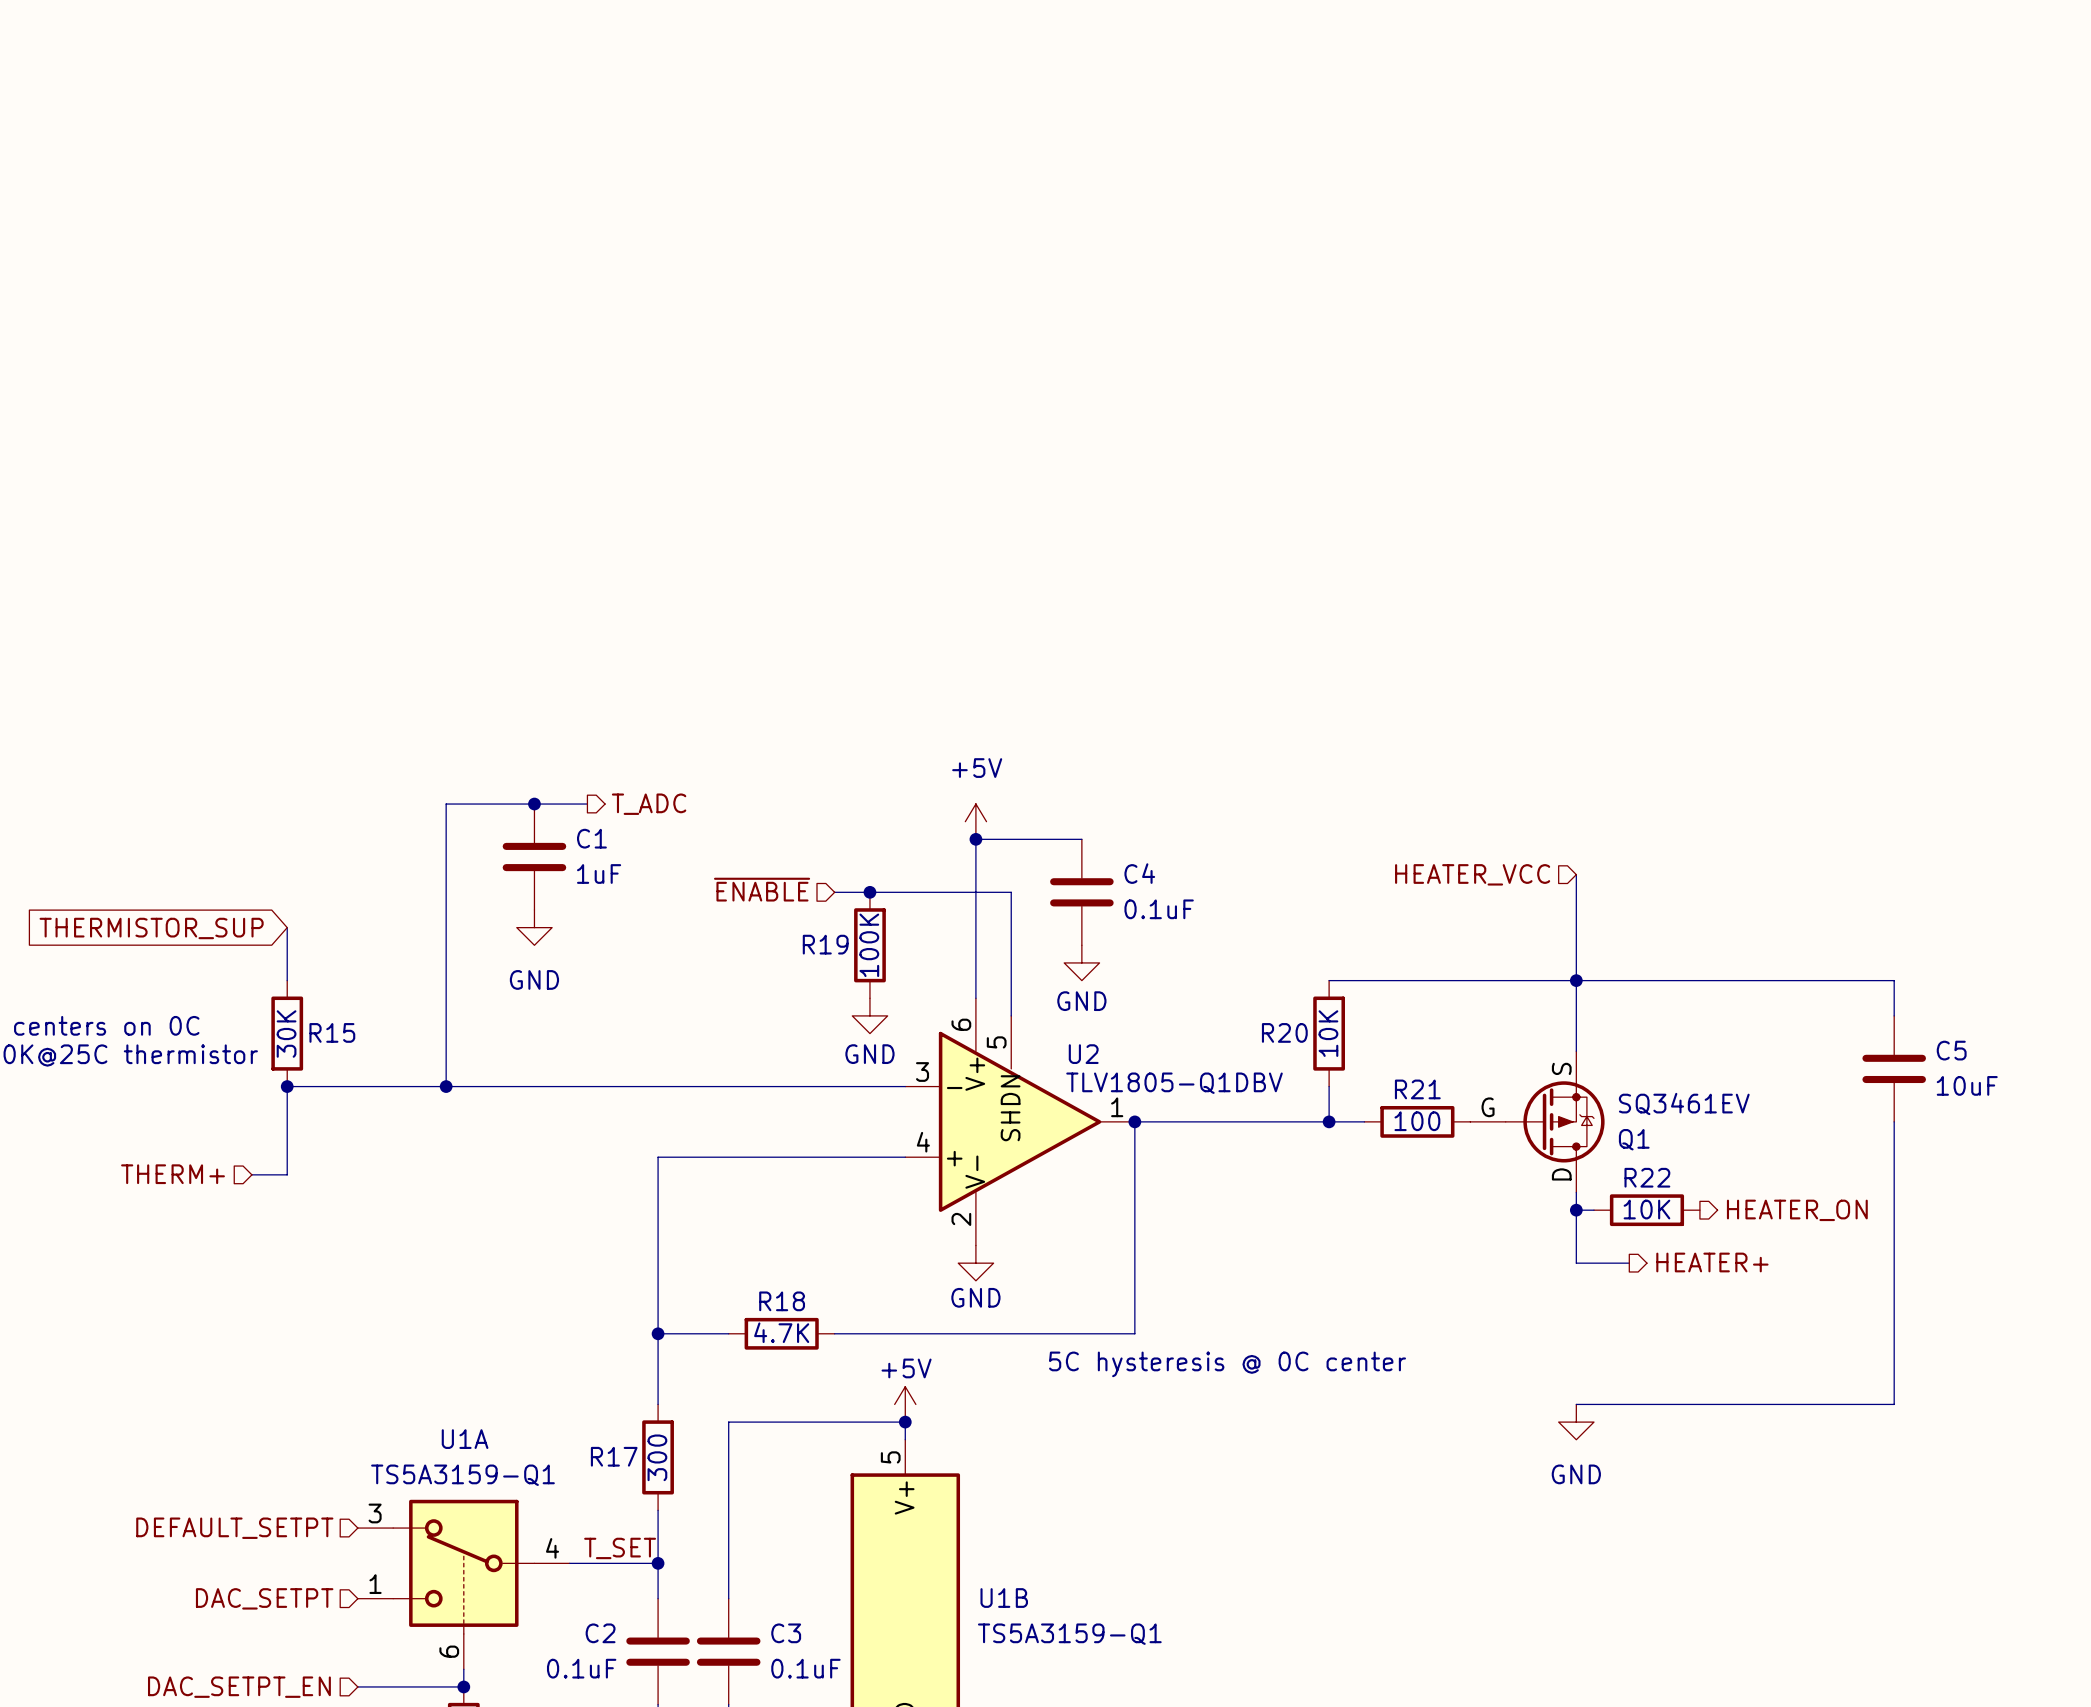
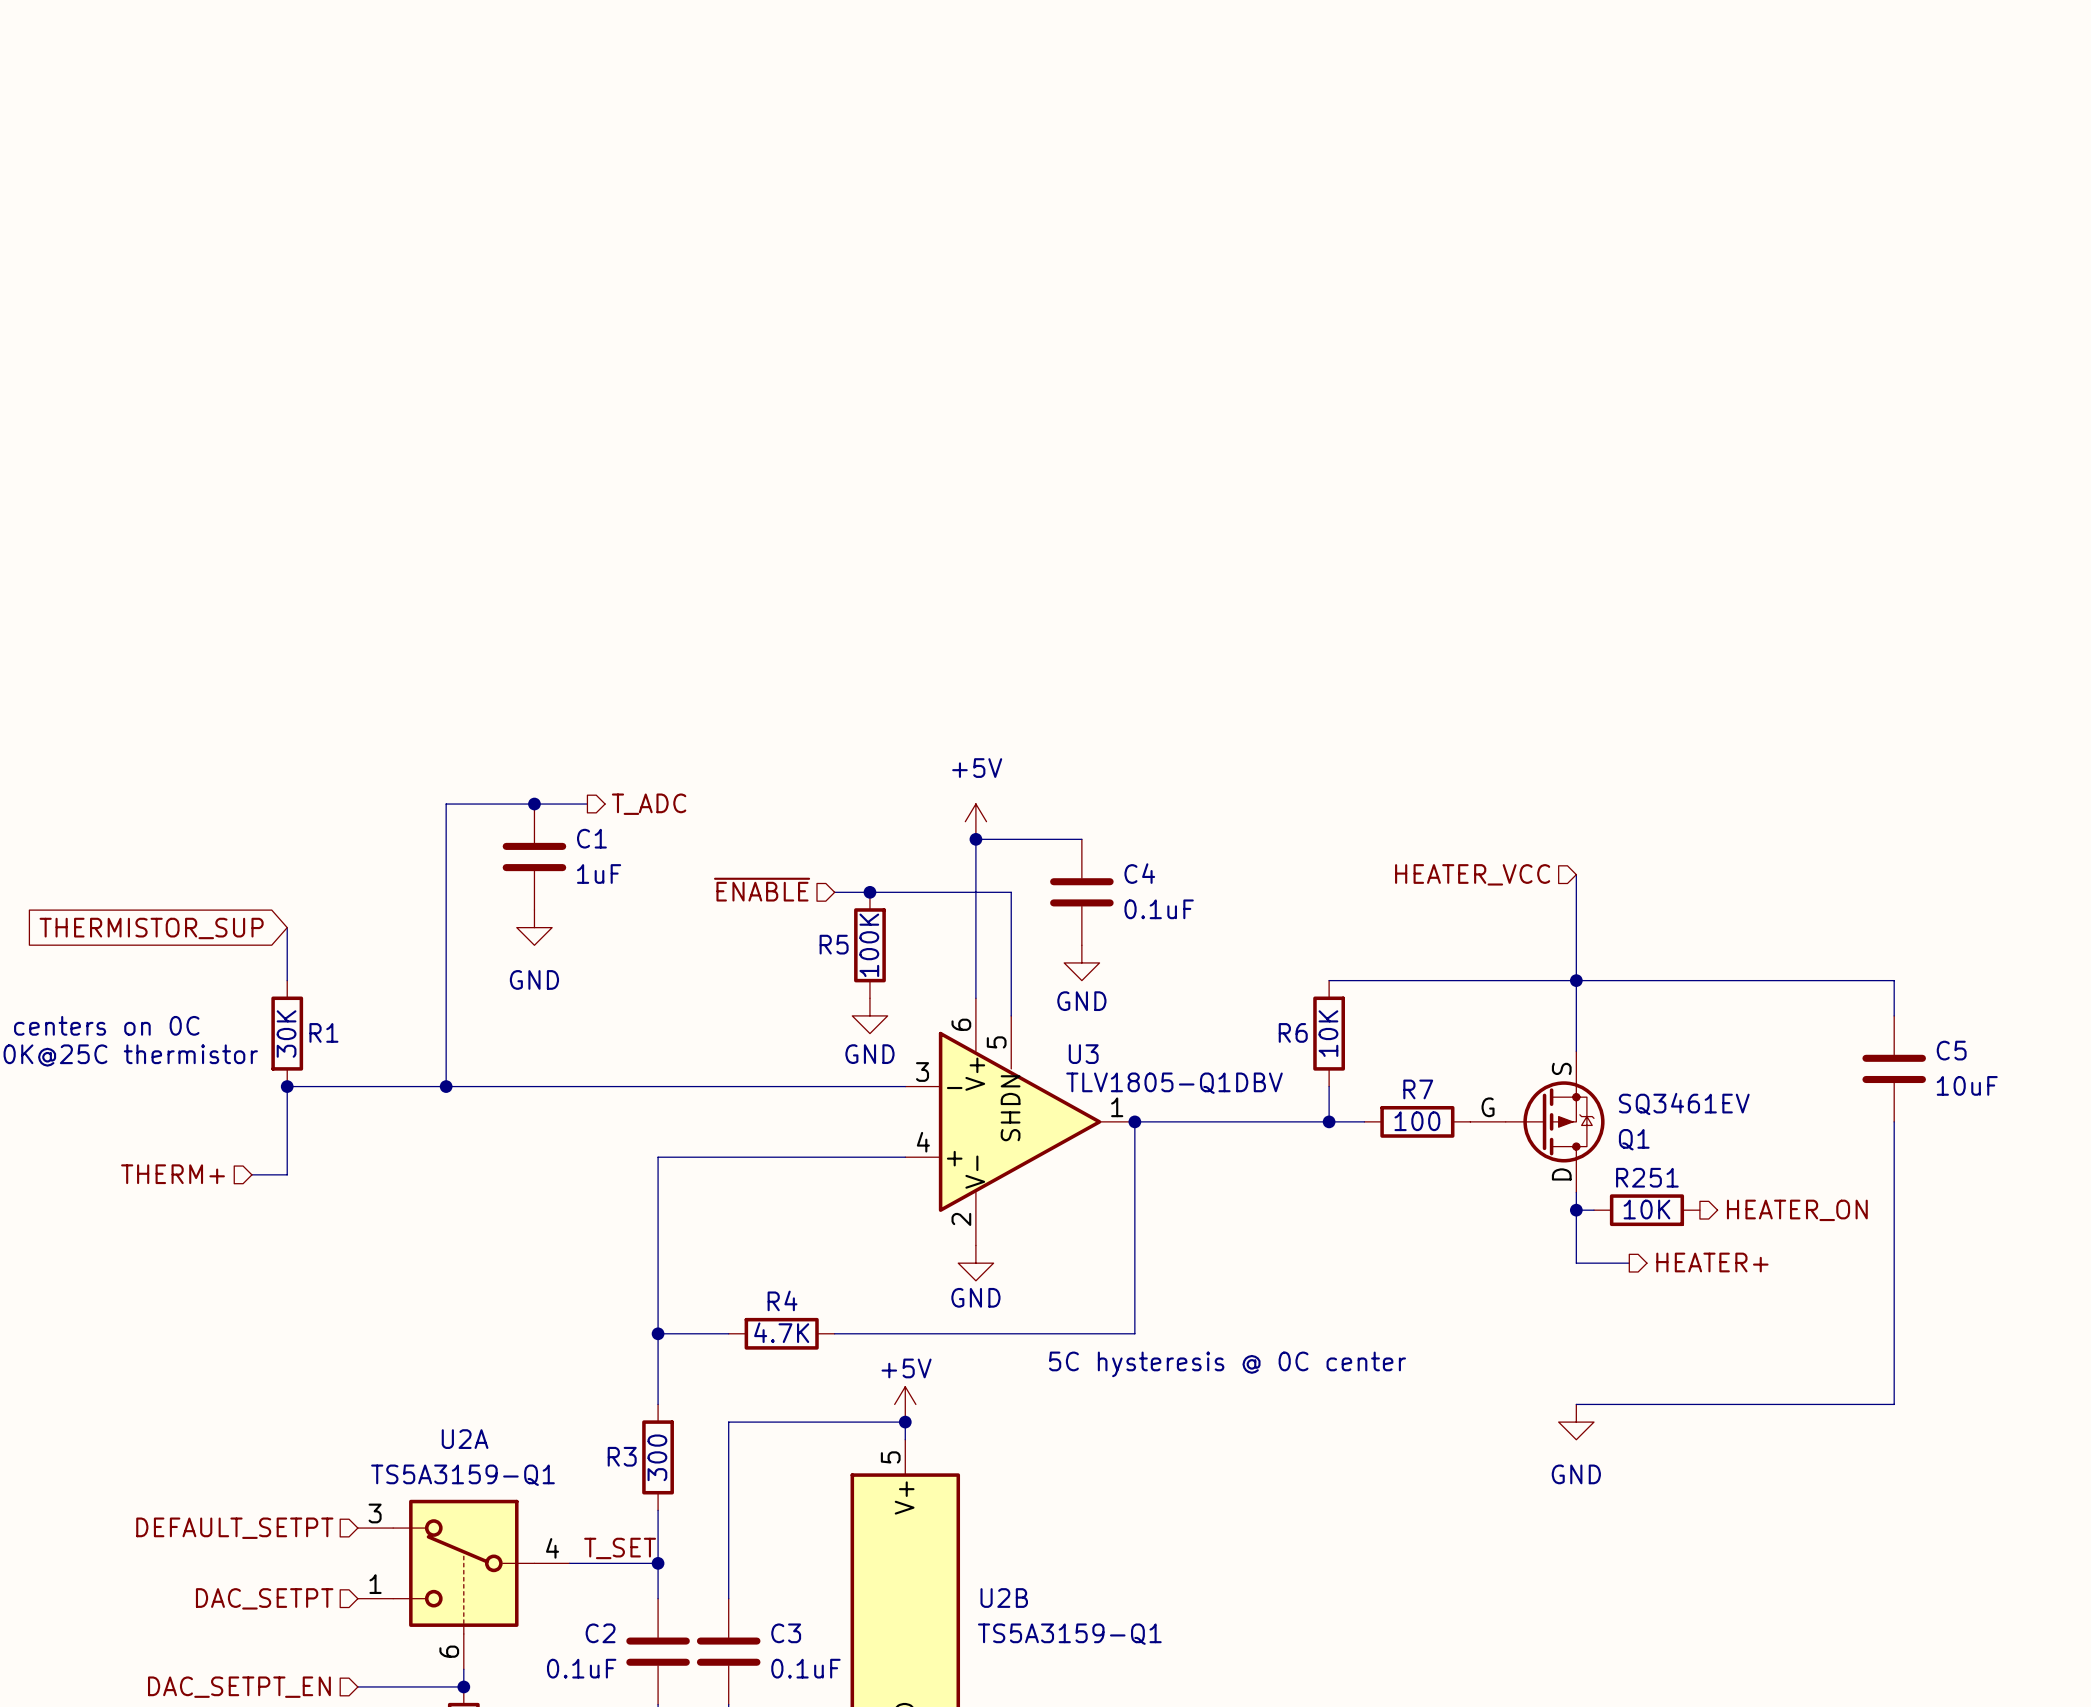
R19 name: R19 (825, 944) -> R5 (834, 944)
R15 name: R15 (332, 1032) -> R1 (323, 1032)
R20 name: R20 (1284, 1032) -> R6 (1293, 1032)
U2 name: U2 (1083, 1054) -> U3 (1083, 1054)
R21 name: R21 (1417, 1089) -> R7 (1418, 1089)
R22 name: R22 (1647, 1177) -> R251 (1647, 1177)
R18 name: R18 (782, 1301) -> R4 (782, 1300)
U1A name: U1A (465, 1439) -> U2A (465, 1439)
R17 name: R17 (614, 1456) -> R3 (622, 1456)
U1B name: U1B (1004, 1598) -> U2B (1004, 1598)

